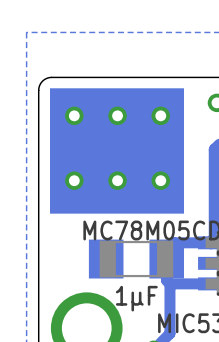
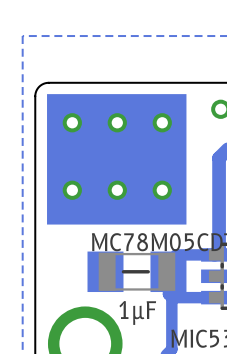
line: none -> (148, 271) (123, 271)

